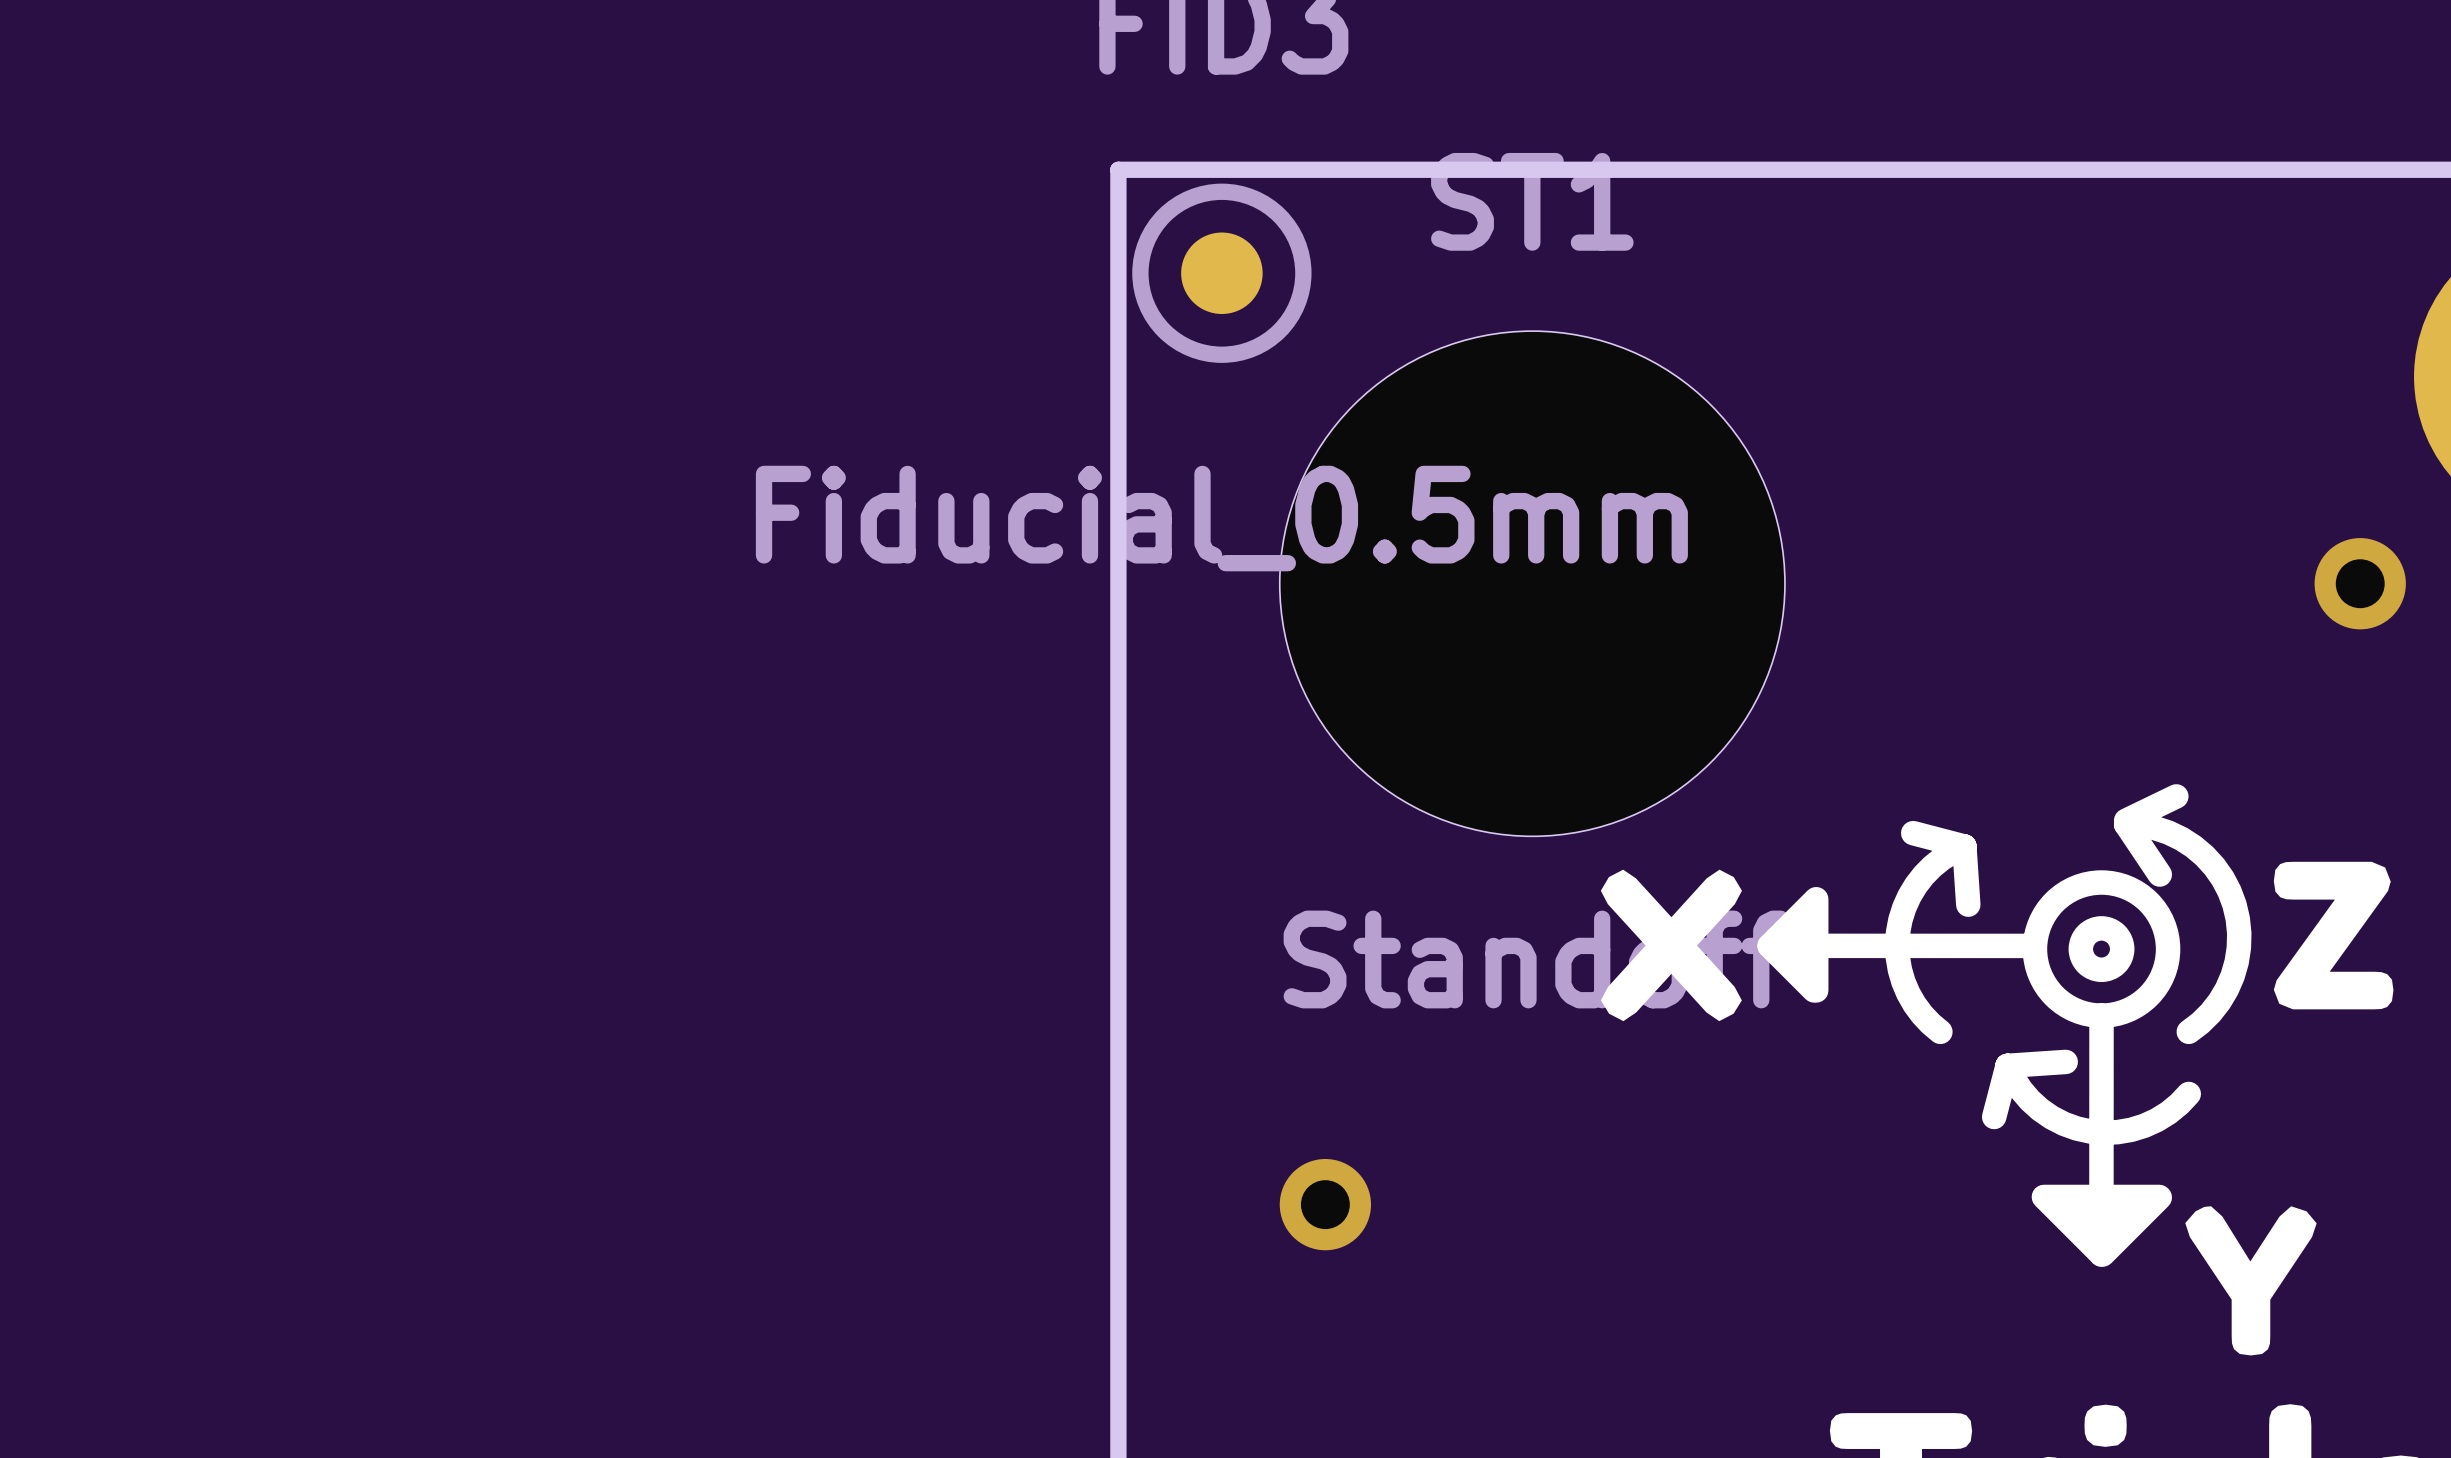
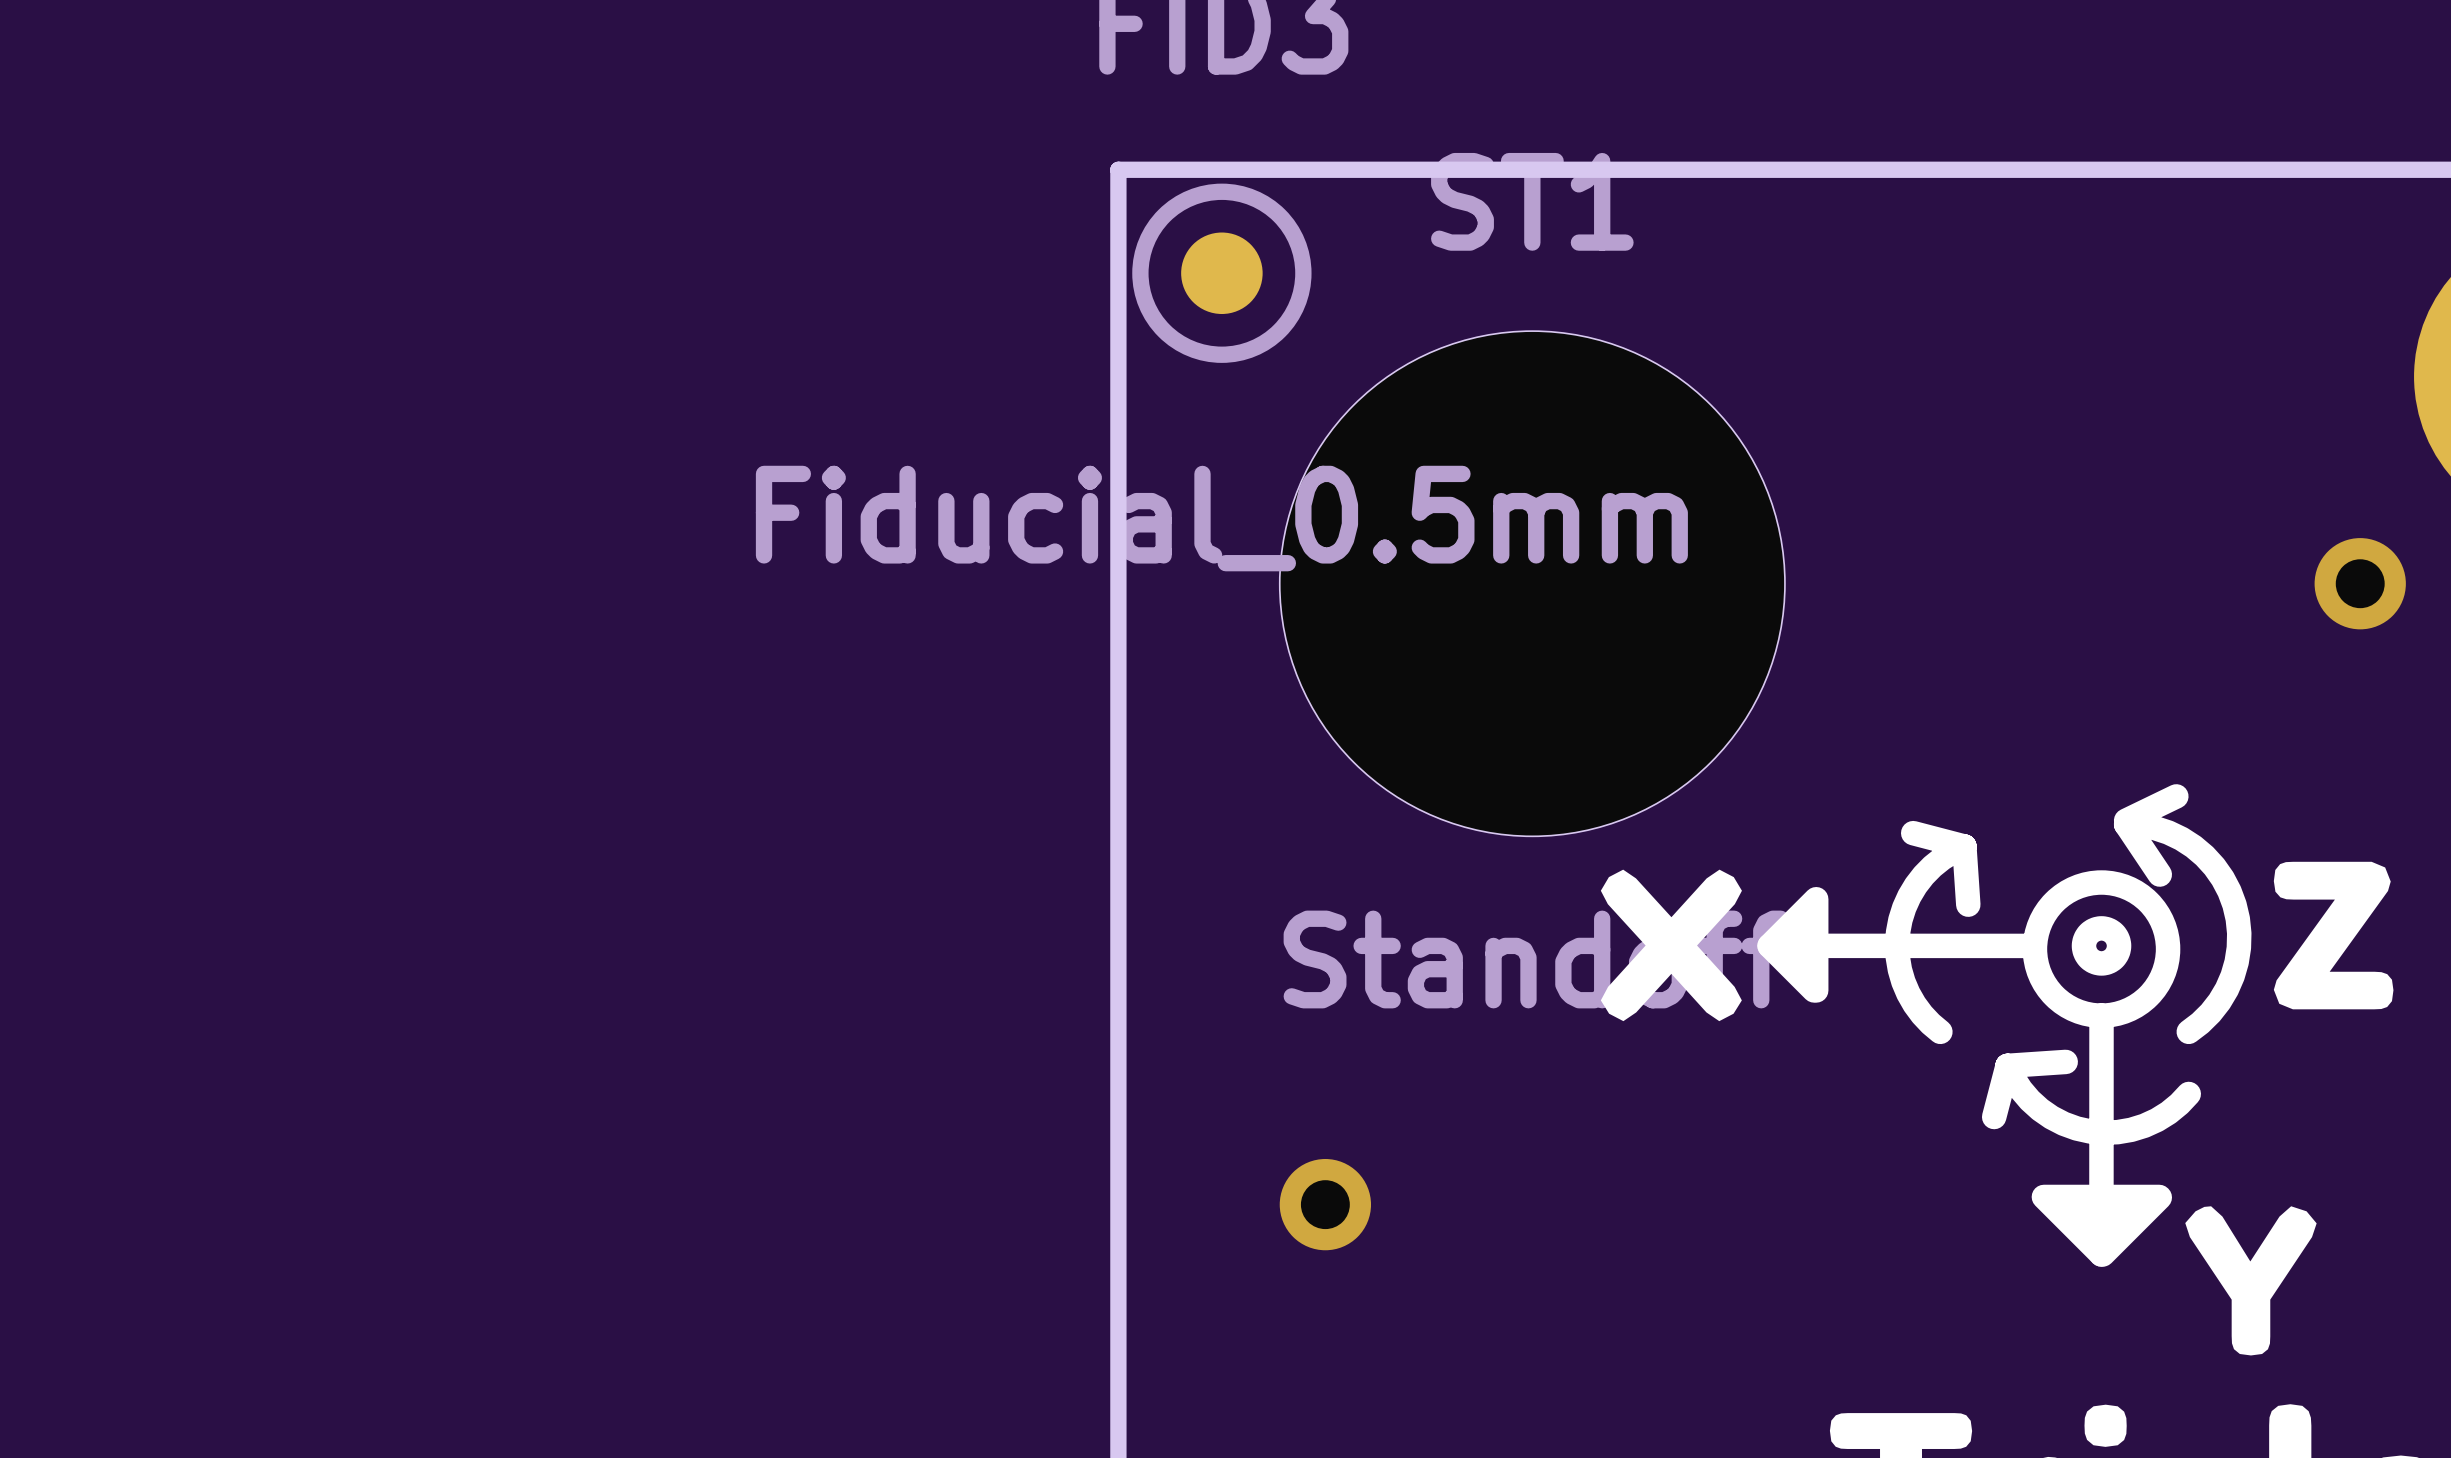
drawing shape: [2068, 916, 2135, 983] -> [2071, 916, 2132, 976]

